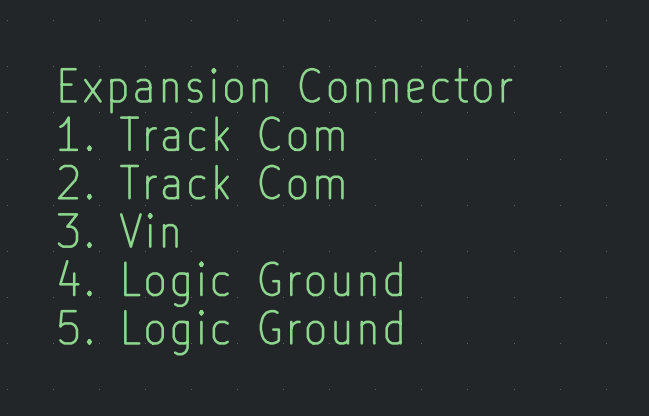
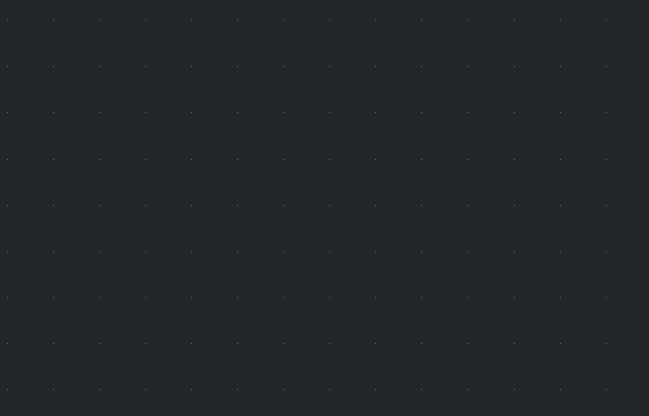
text: Expansion Connector (286, 90) -> none
text: 1. Track Com (201, 133) -> none
text: 2. Track Com (200, 182) -> none
text: 3. Vin (117, 230) -> none
text: 4. Logic Ground (230, 283) -> none
text: 5. Logic Ground (230, 332) -> none

